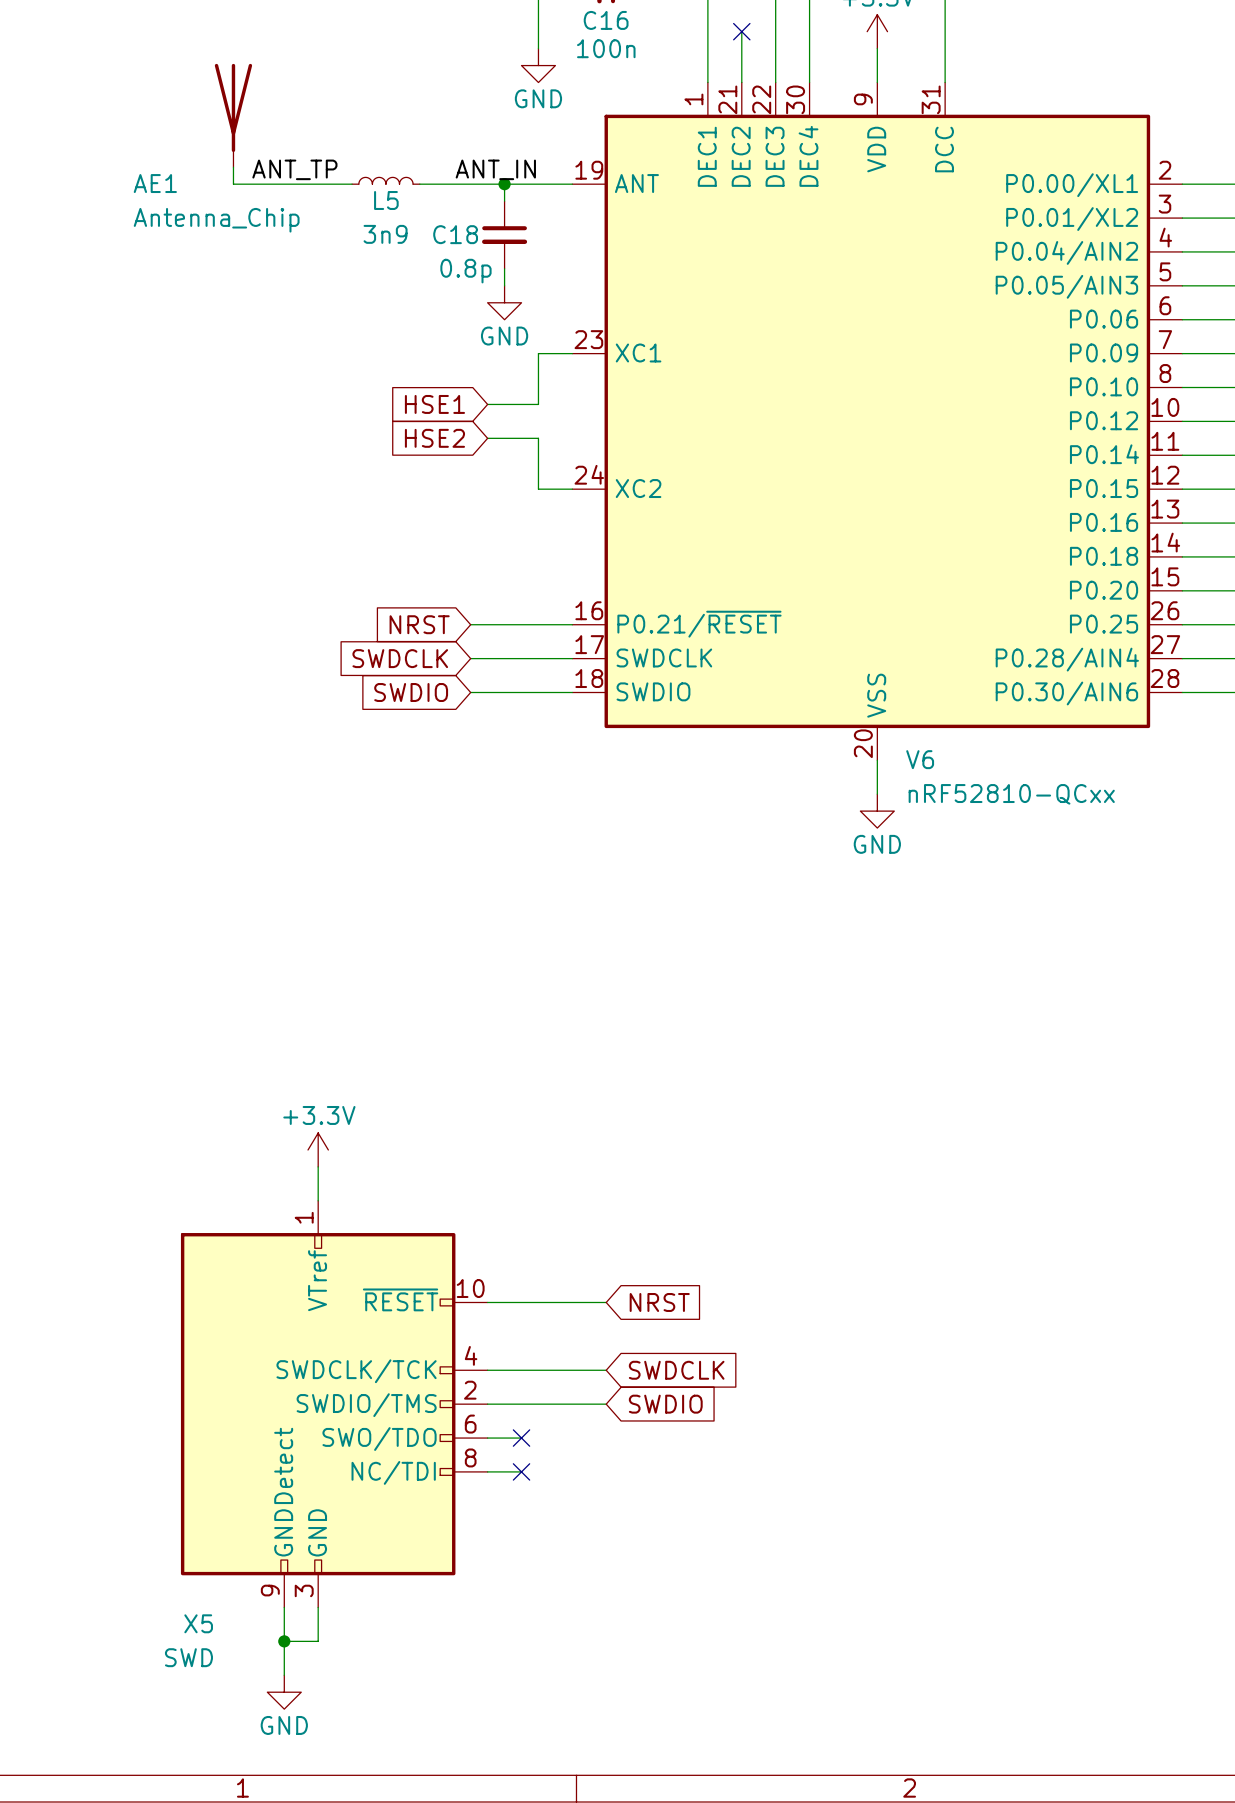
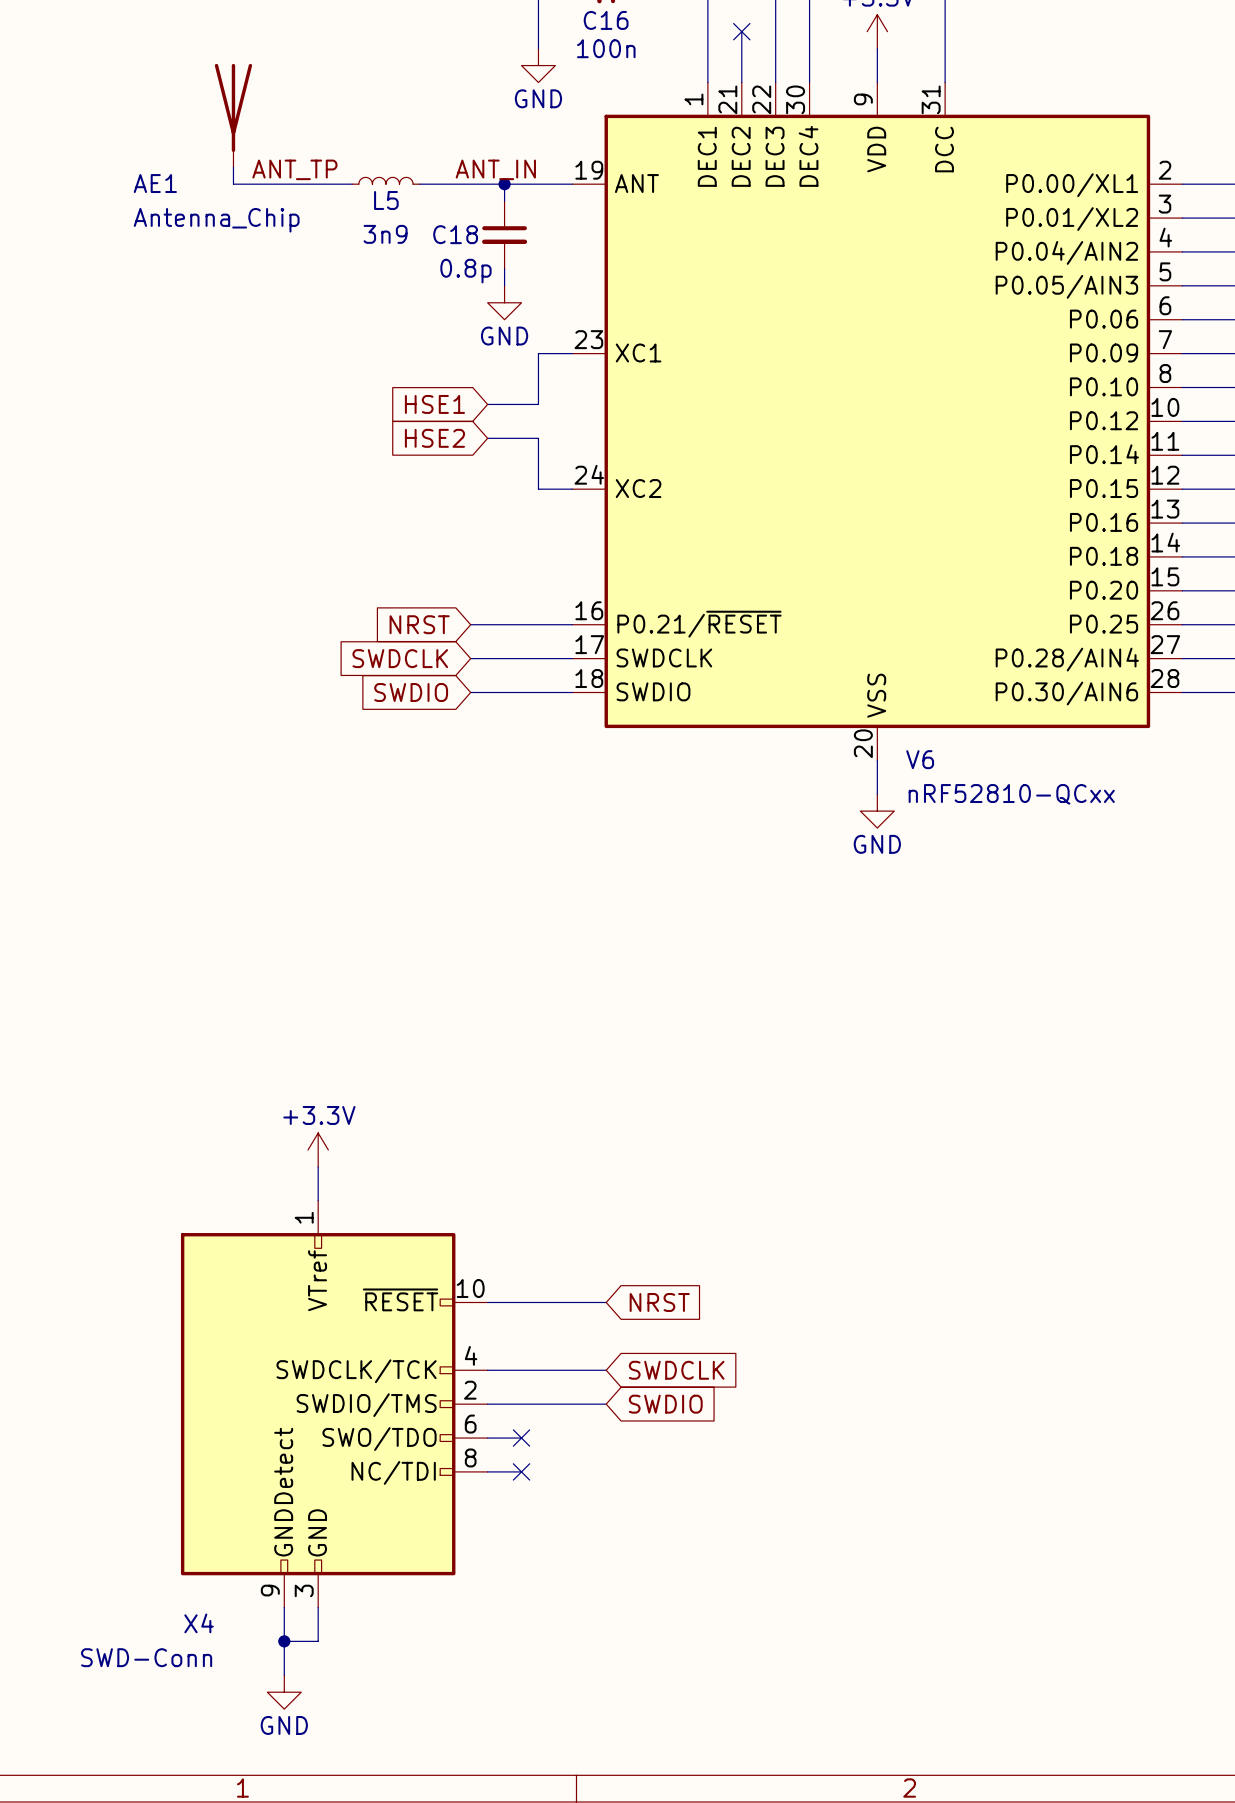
X5 name: X5 (198, 1623) -> X4 (199, 1623)
X5 value: SWD (188, 1657) -> SWD-Conn (146, 1657)

